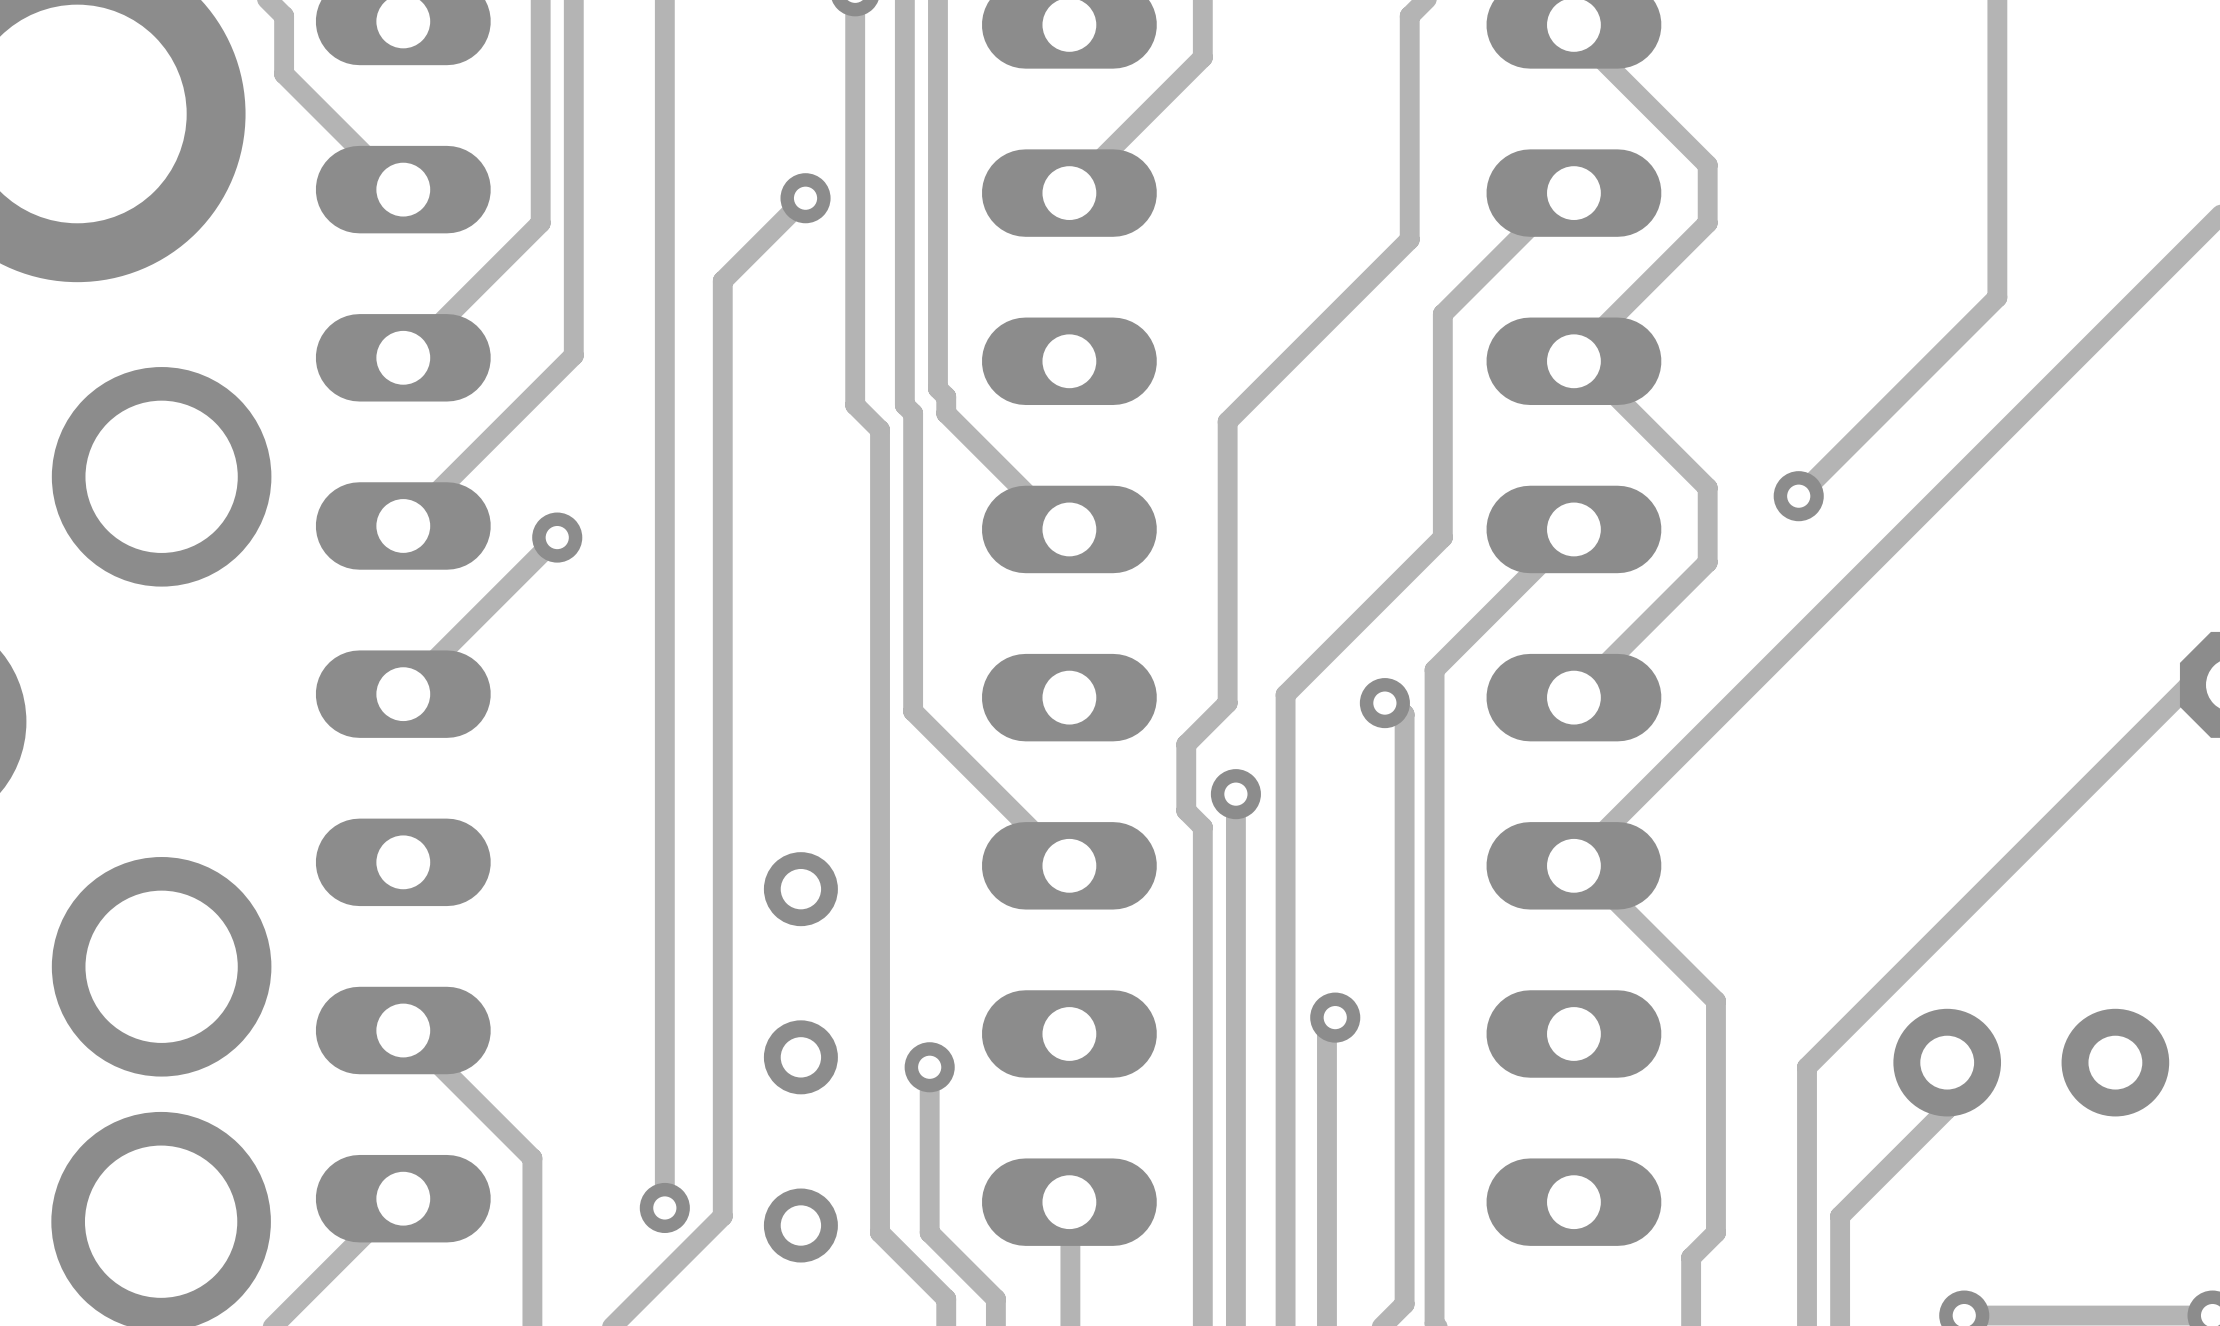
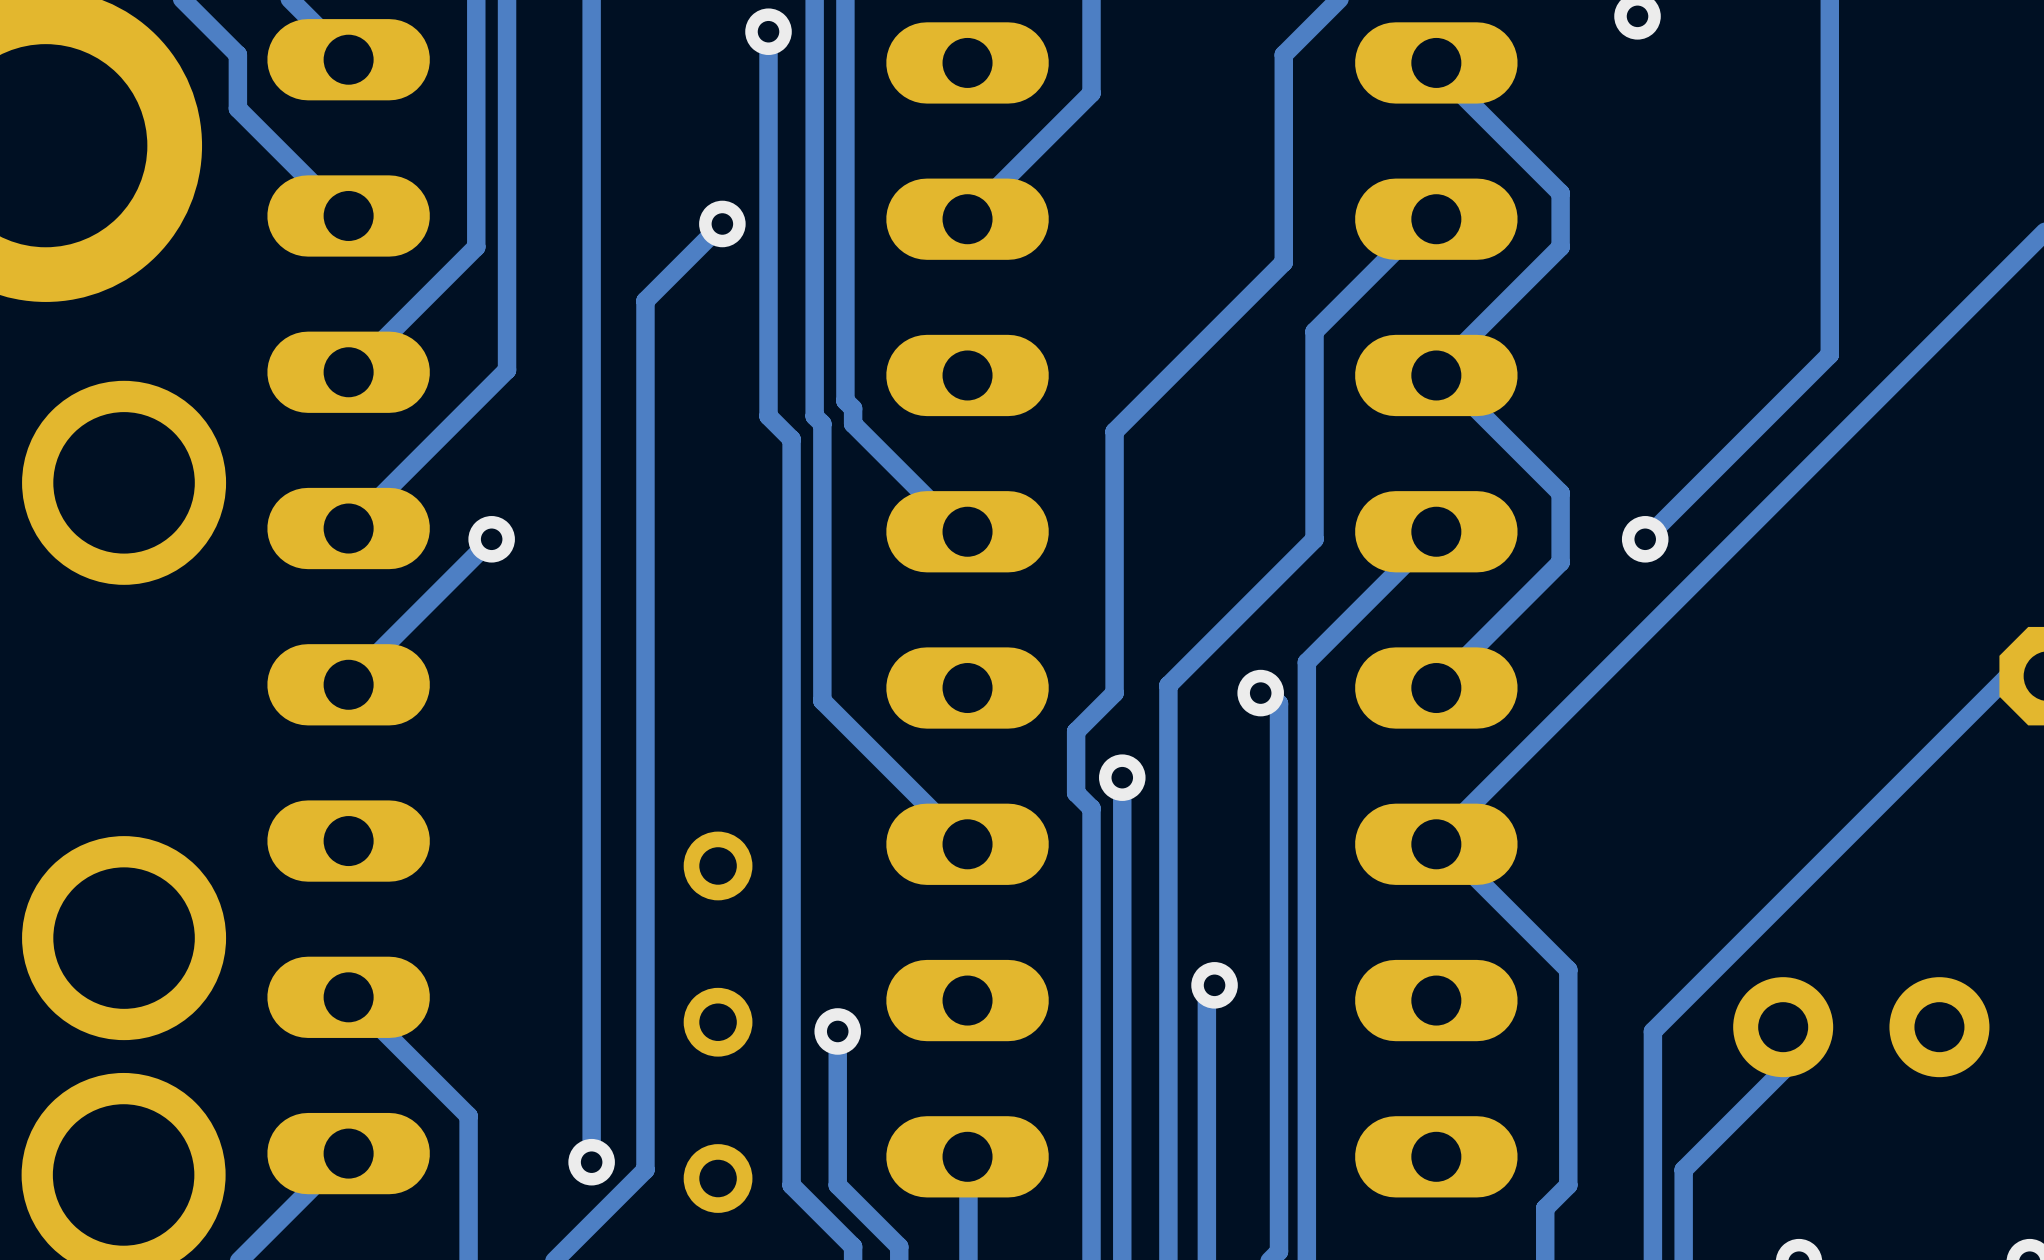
track: (1997, 297) (1798, 496) -> (1829, 316) (1829, 354) (1645, 539)
via position: (1798, 496) -> (1645, 539)

